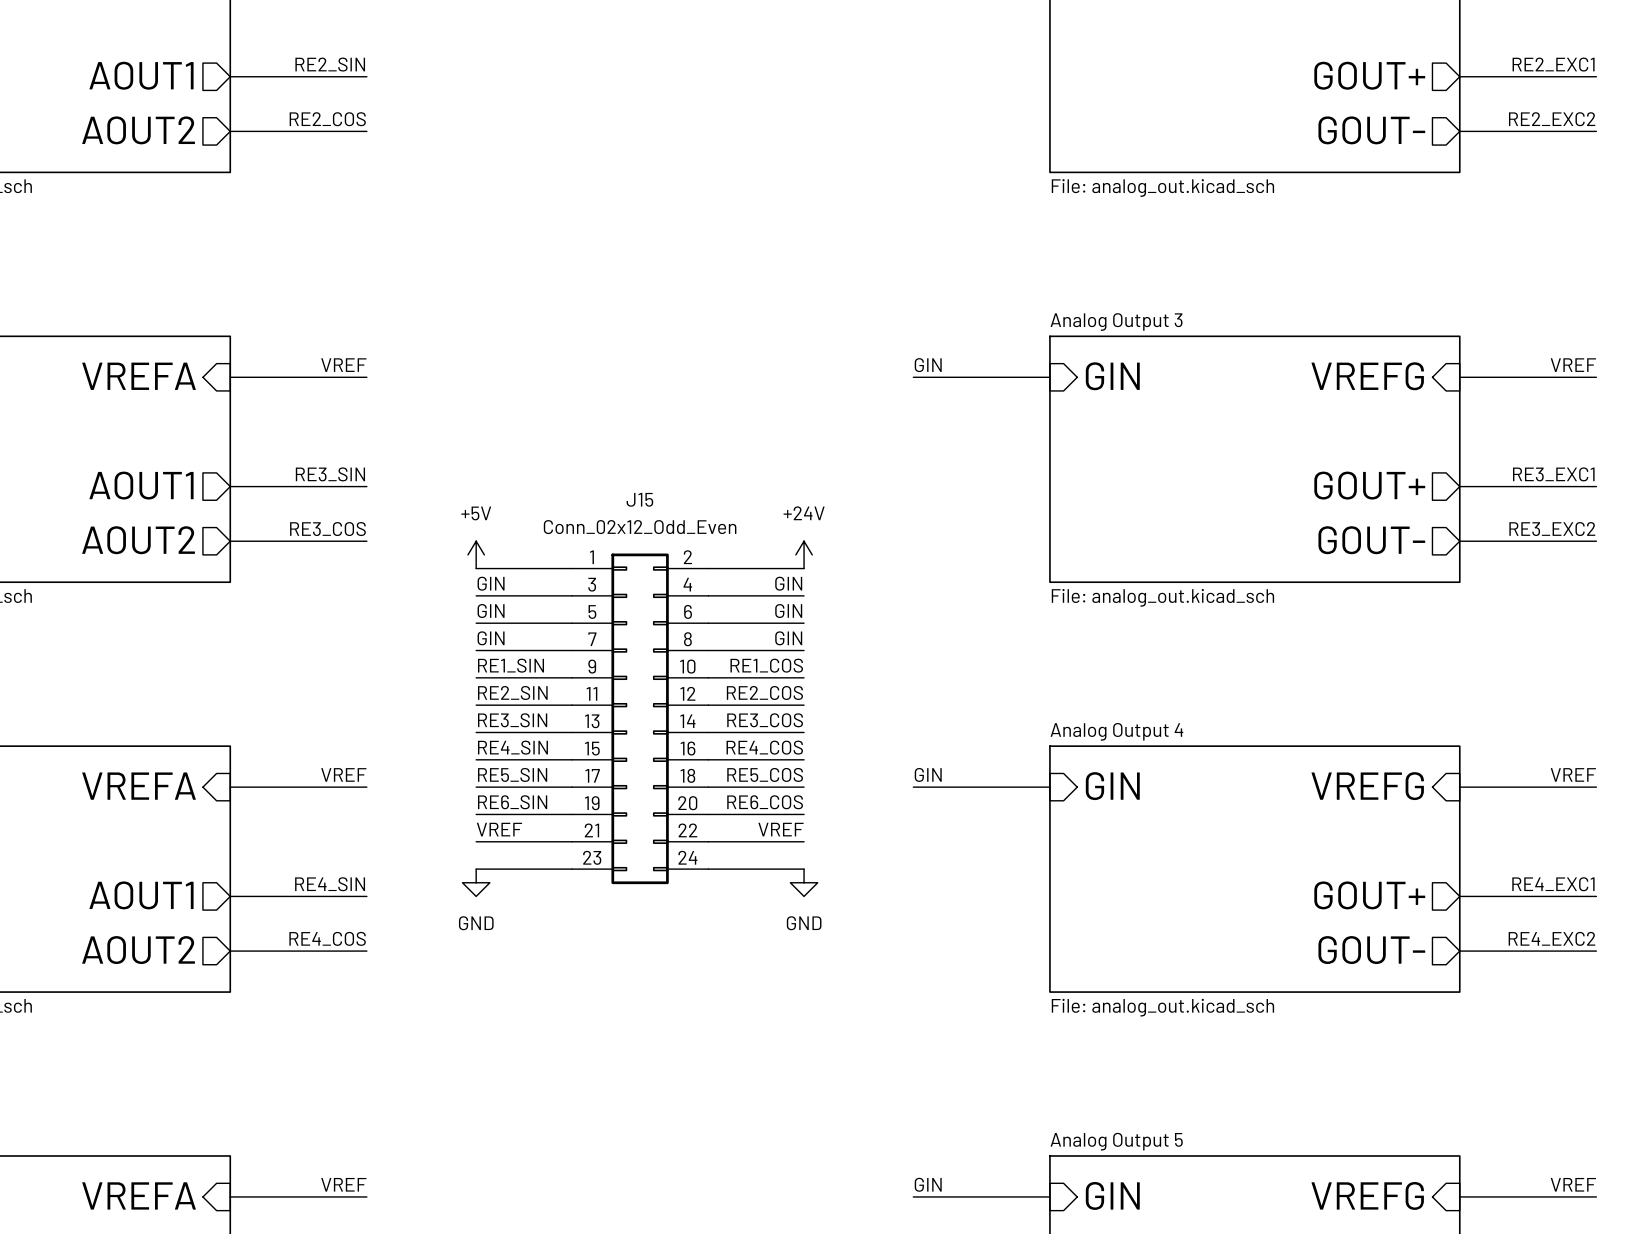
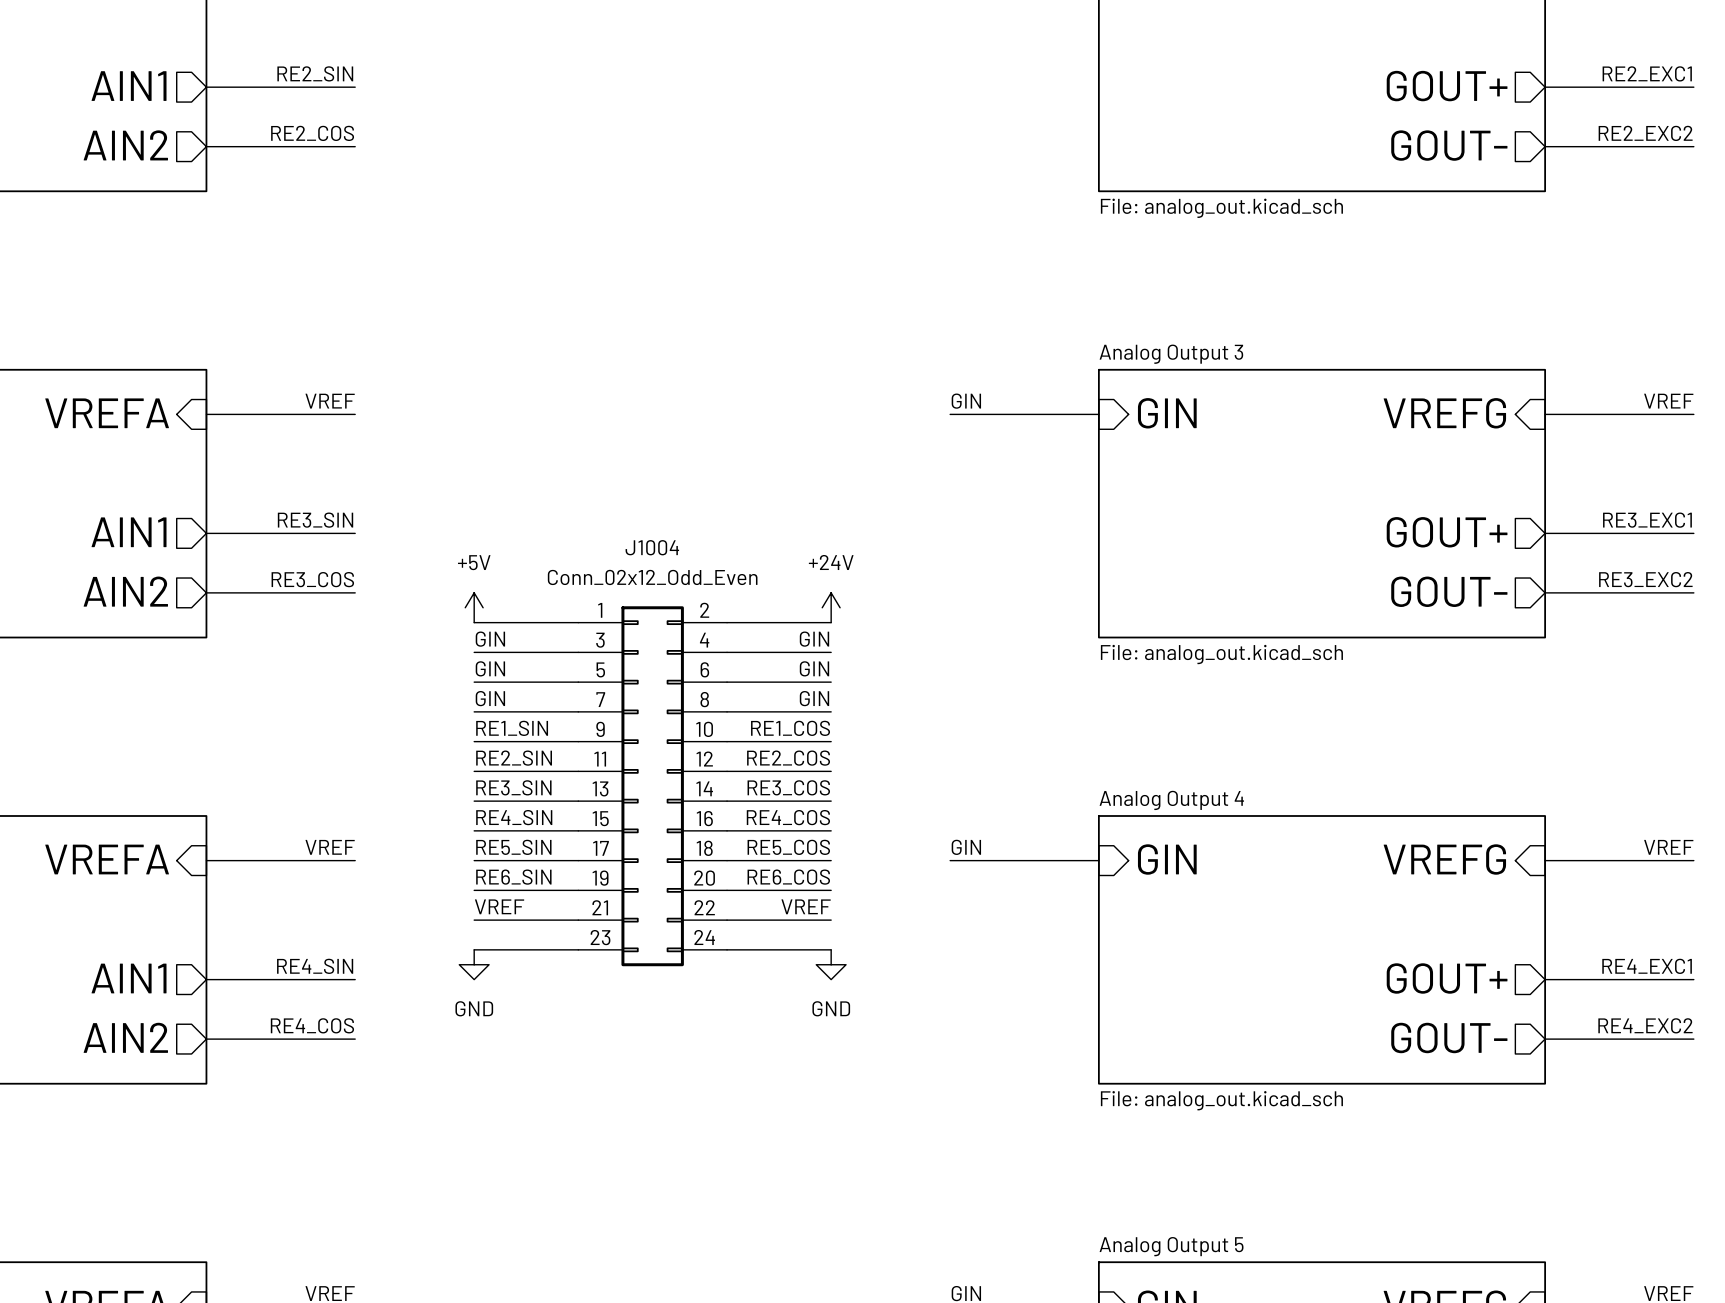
sheet pin: AOUT1 (141, 75) -> AIN1 (128, 86)
sheet pin: AOUT2 (138, 130) -> AIN2 (125, 145)
sheet pin: AOUT1 (141, 485) -> AIN1 (128, 532)
J15 name: J15 (639, 499) -> J1004 (652, 547)
sheet pin: AOUT2 (138, 540) -> AIN2 (125, 591)
sheet pin: AOUT1 (141, 895) -> AIN1 (128, 978)
sheet pin: AOUT2 (138, 950) -> AIN2 (125, 1037)

